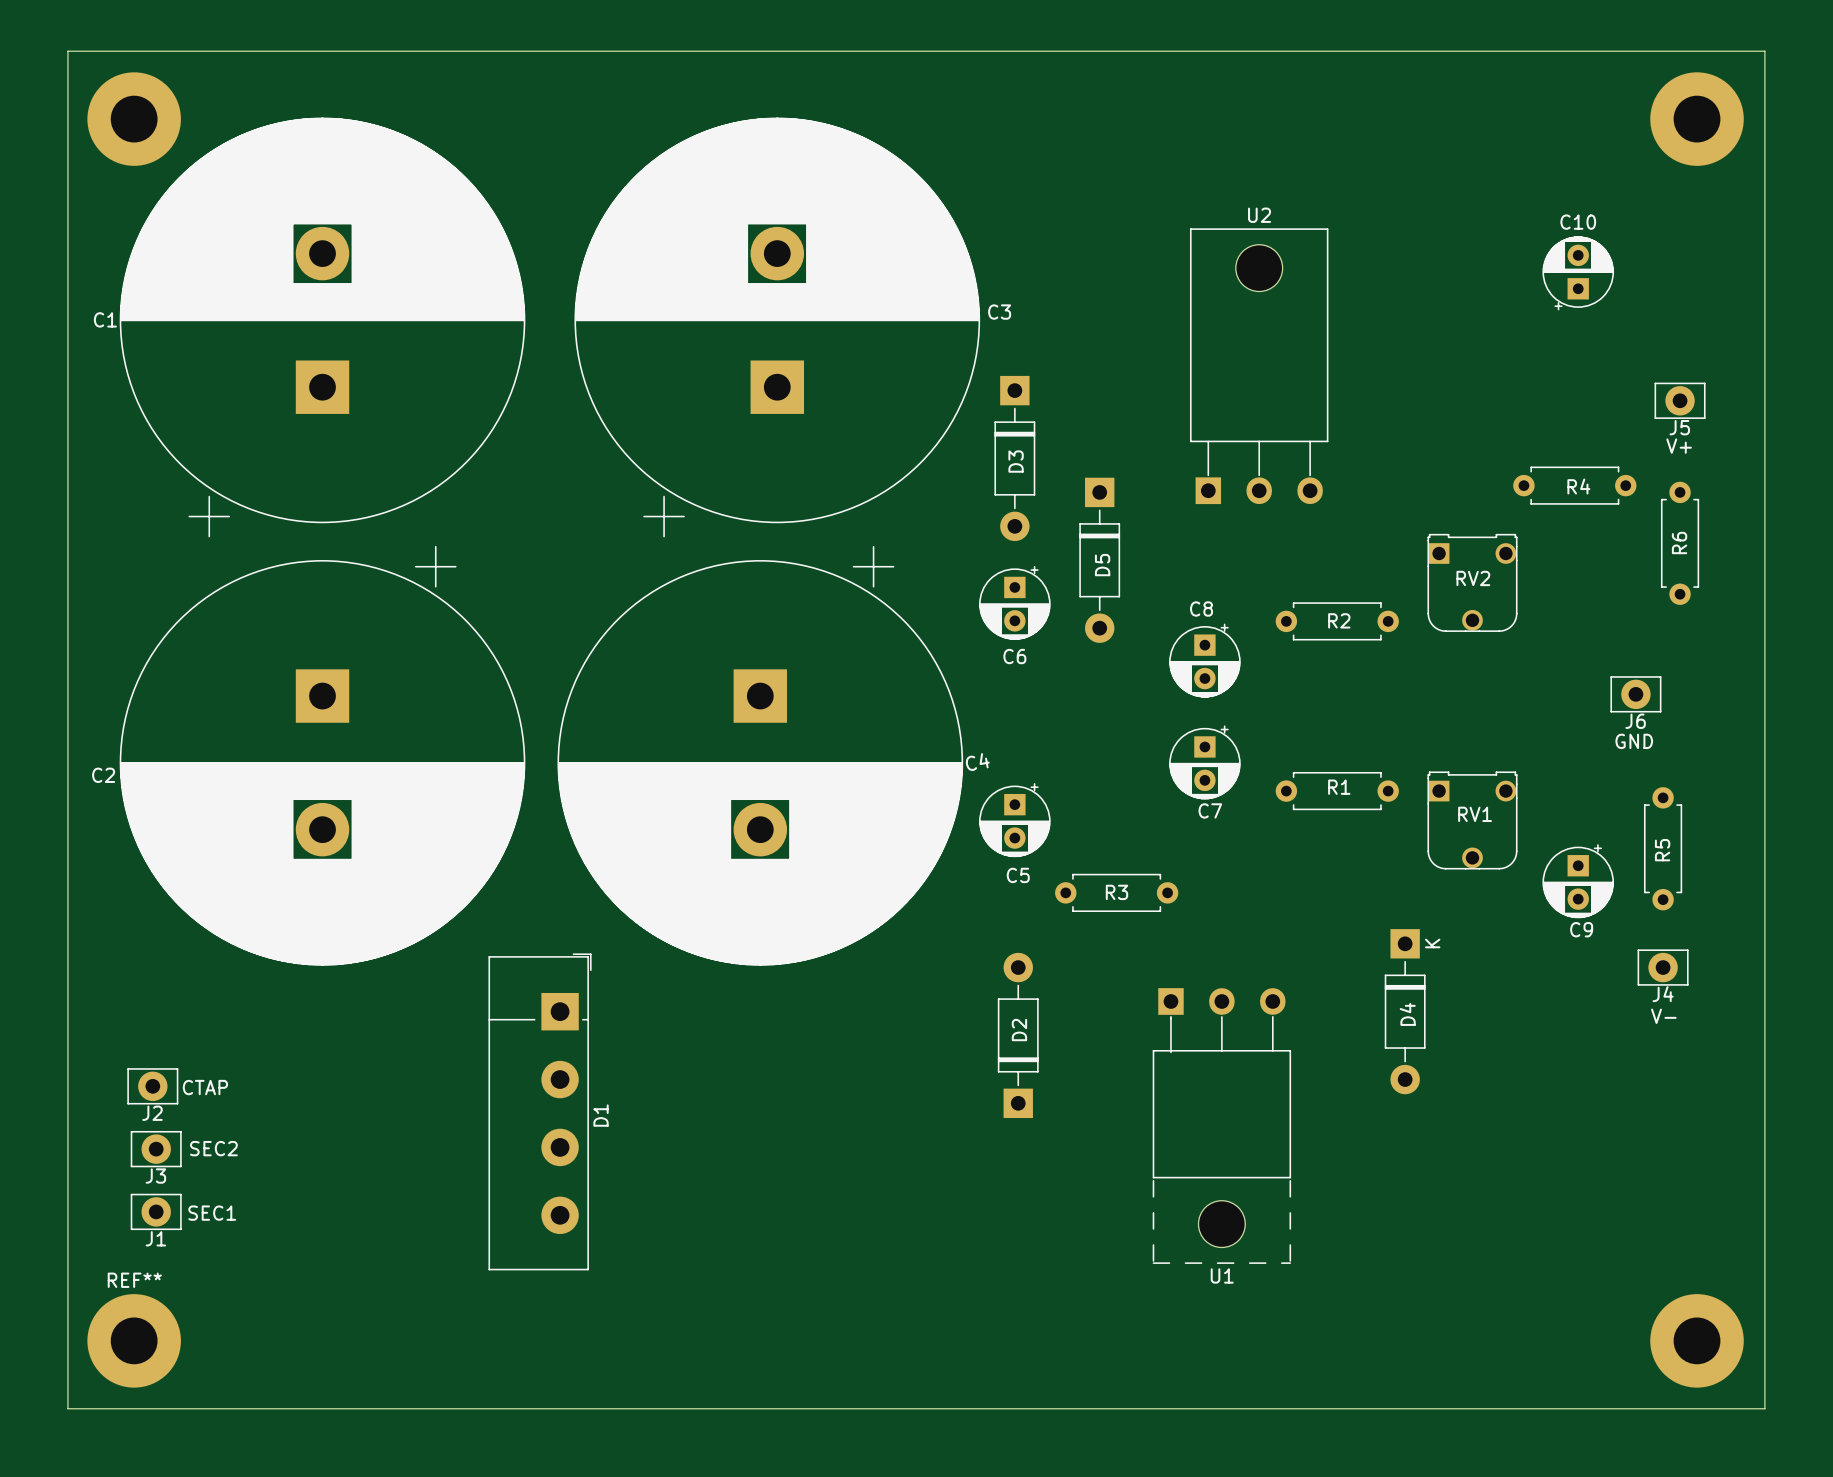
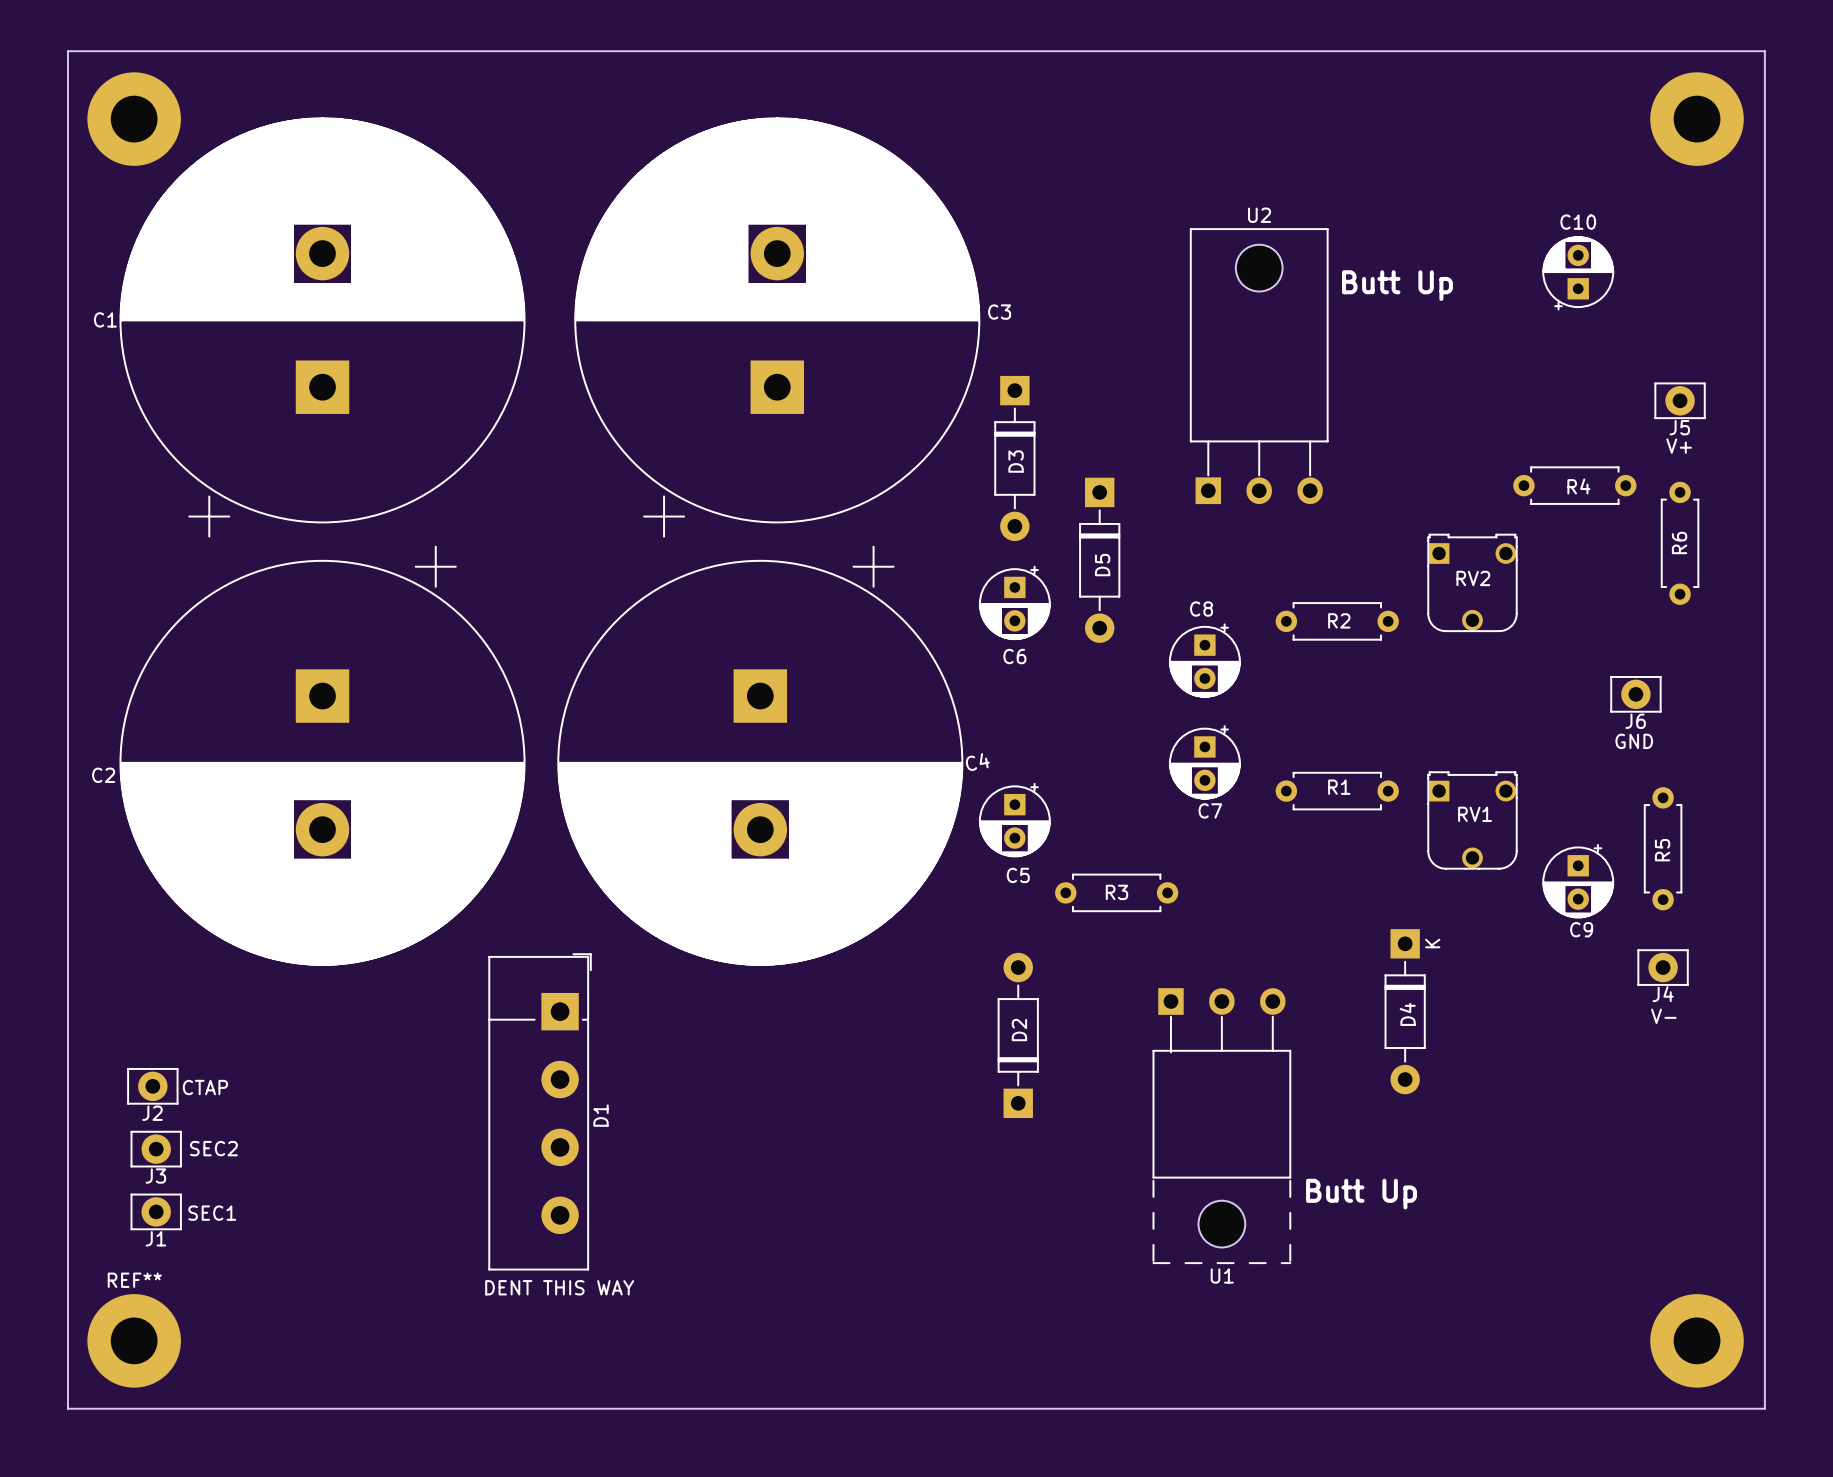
text: none -> Butt Up (1397, 285)
text: none -> Butt Up (1361, 1194)
text: none -> DENT THIS WAY (559, 1287)

